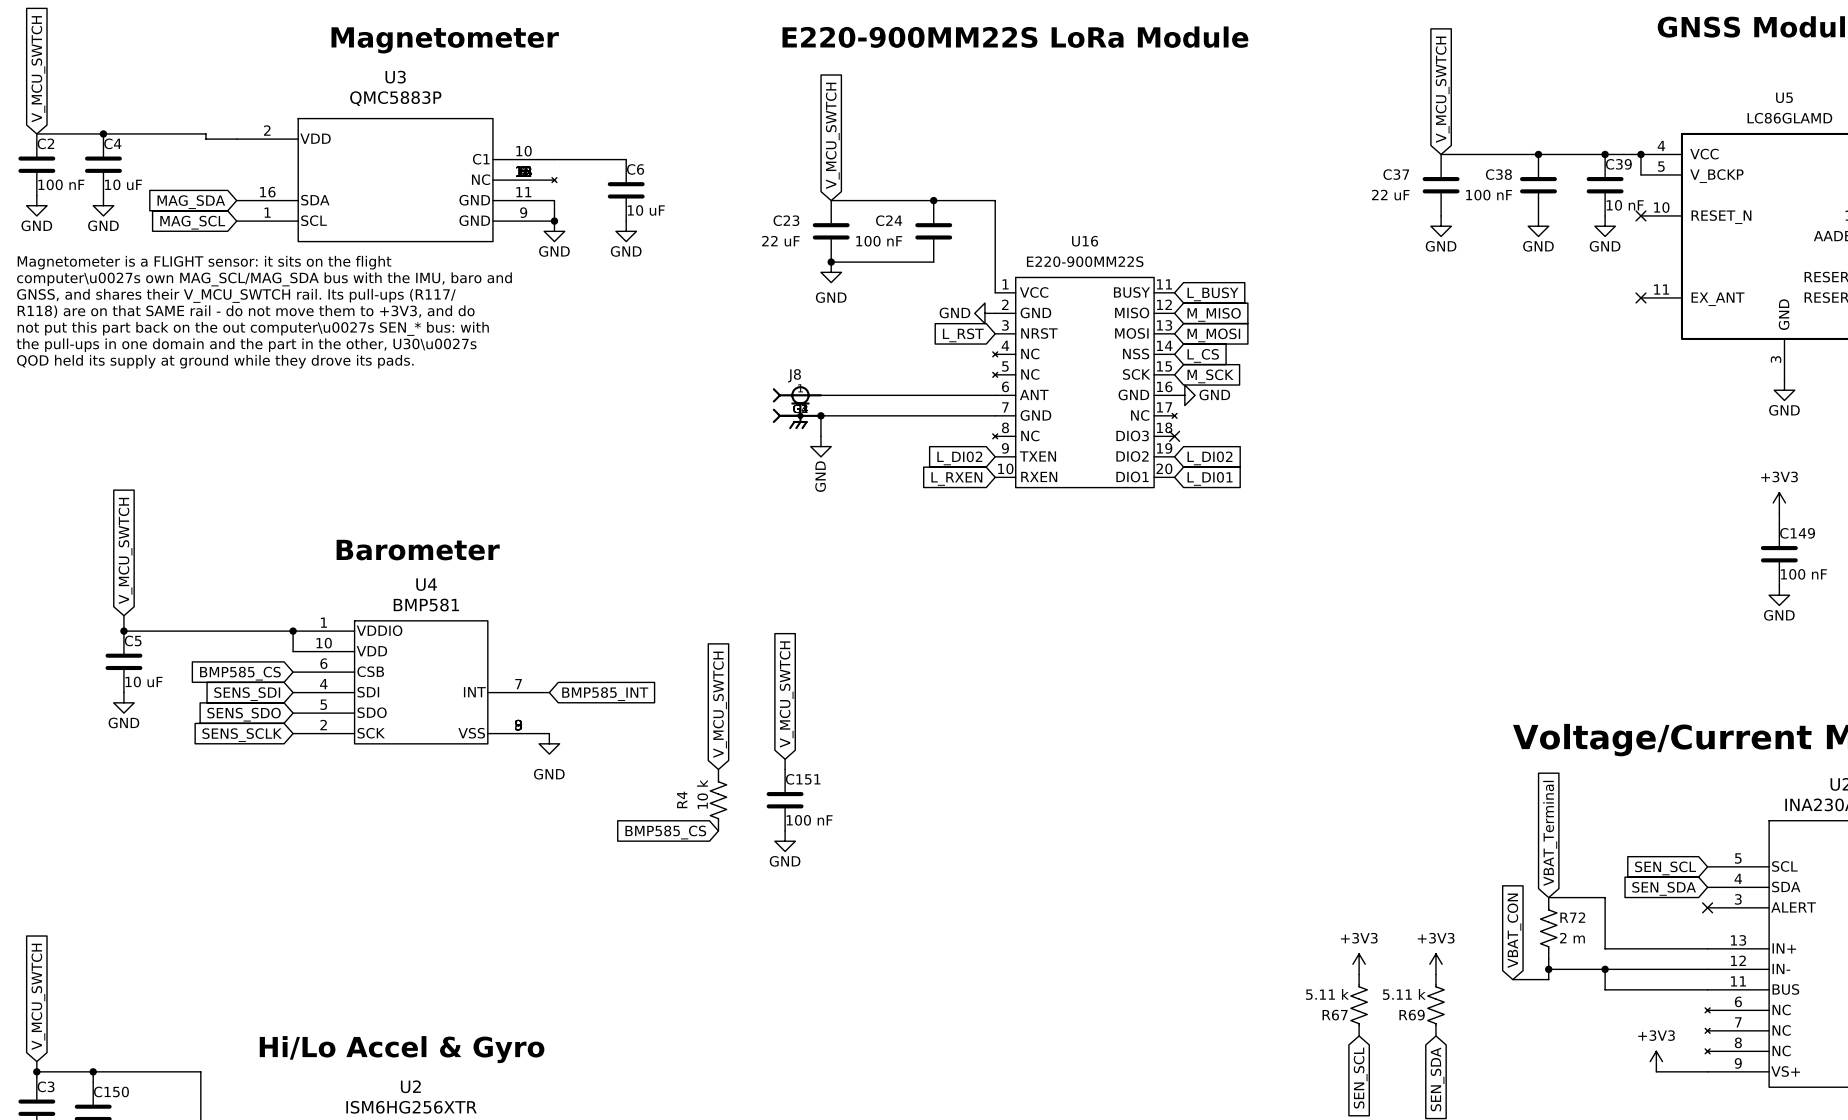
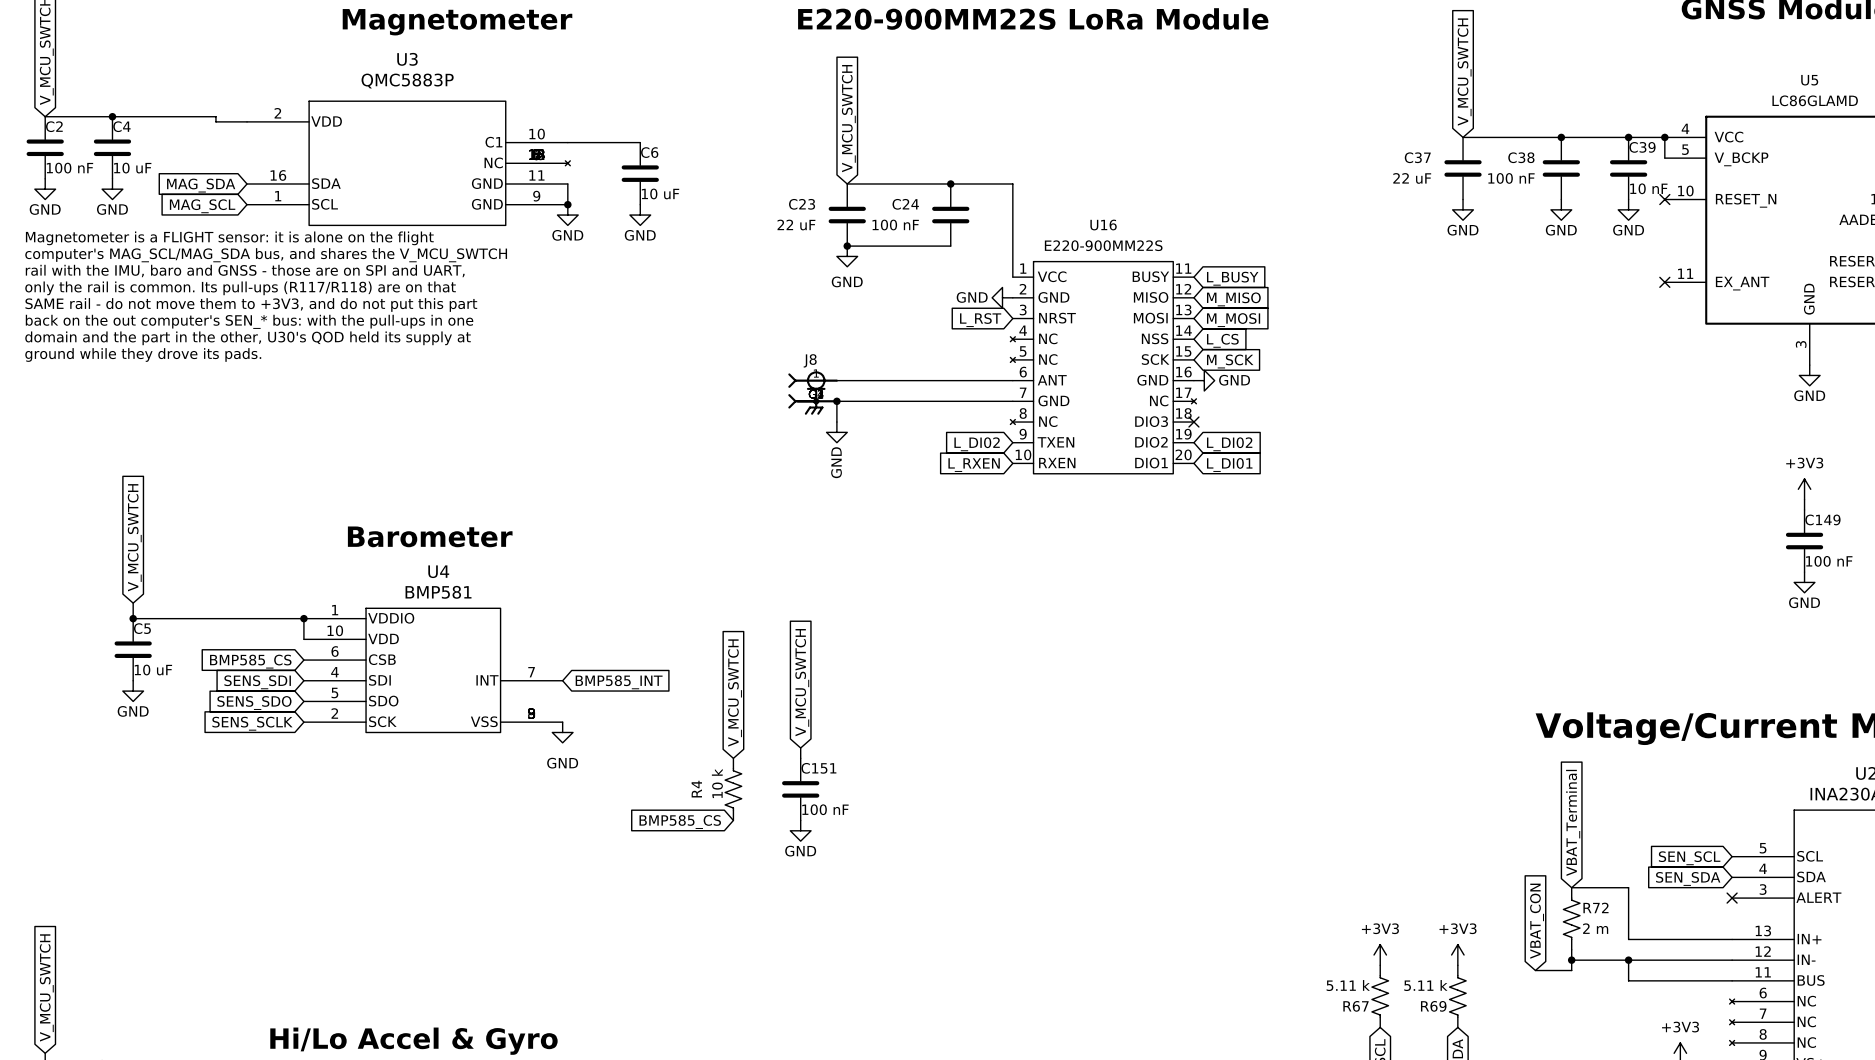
text: Magnetometer is a FLIGHT sensor: it sits on the flight (204, 262) -> Magnetometer is a FLIGHT sensor: it is alone on the flight (229, 238)
text: computer\u0027s own MAG_SCL/MAG_SDA bus with the IMU, baro and (264, 279) -> computer's MAG_SCL/MAG_SDA bus, and shares the V_MCU_SWTCH (266, 255)
text: none -> rail with the IMU, baro and GNSS - those are on SPI and UART, (245, 271)
text: GNSS, and shares their V_MCU_SWTCH rail. Its pull-ups (R117/ (236, 295) -> none
text: none -> only the rail is common. Its pull-ups (R117/R118) are on that (240, 288)
text: R118) are on that SAME rail - do not move them to +3V3, and do (246, 311) -> SAME rail - do not move them to +3V3, and do not put this part (251, 304)
text: not put this part back on the out computer\u0027s SEN_* bus: with (253, 328) -> back on the out computer's SEN_* bus: with the pull-ups in one (249, 321)
text: the pull-ups in one domain and the part in the other, U30\u0027s (246, 345) -> domain and the part in the other, U30's QOD held its supply at (248, 338)
text: QOD held its supply at ground while they drove its pads. (215, 361) -> ground while they drove its pads. (143, 354)

